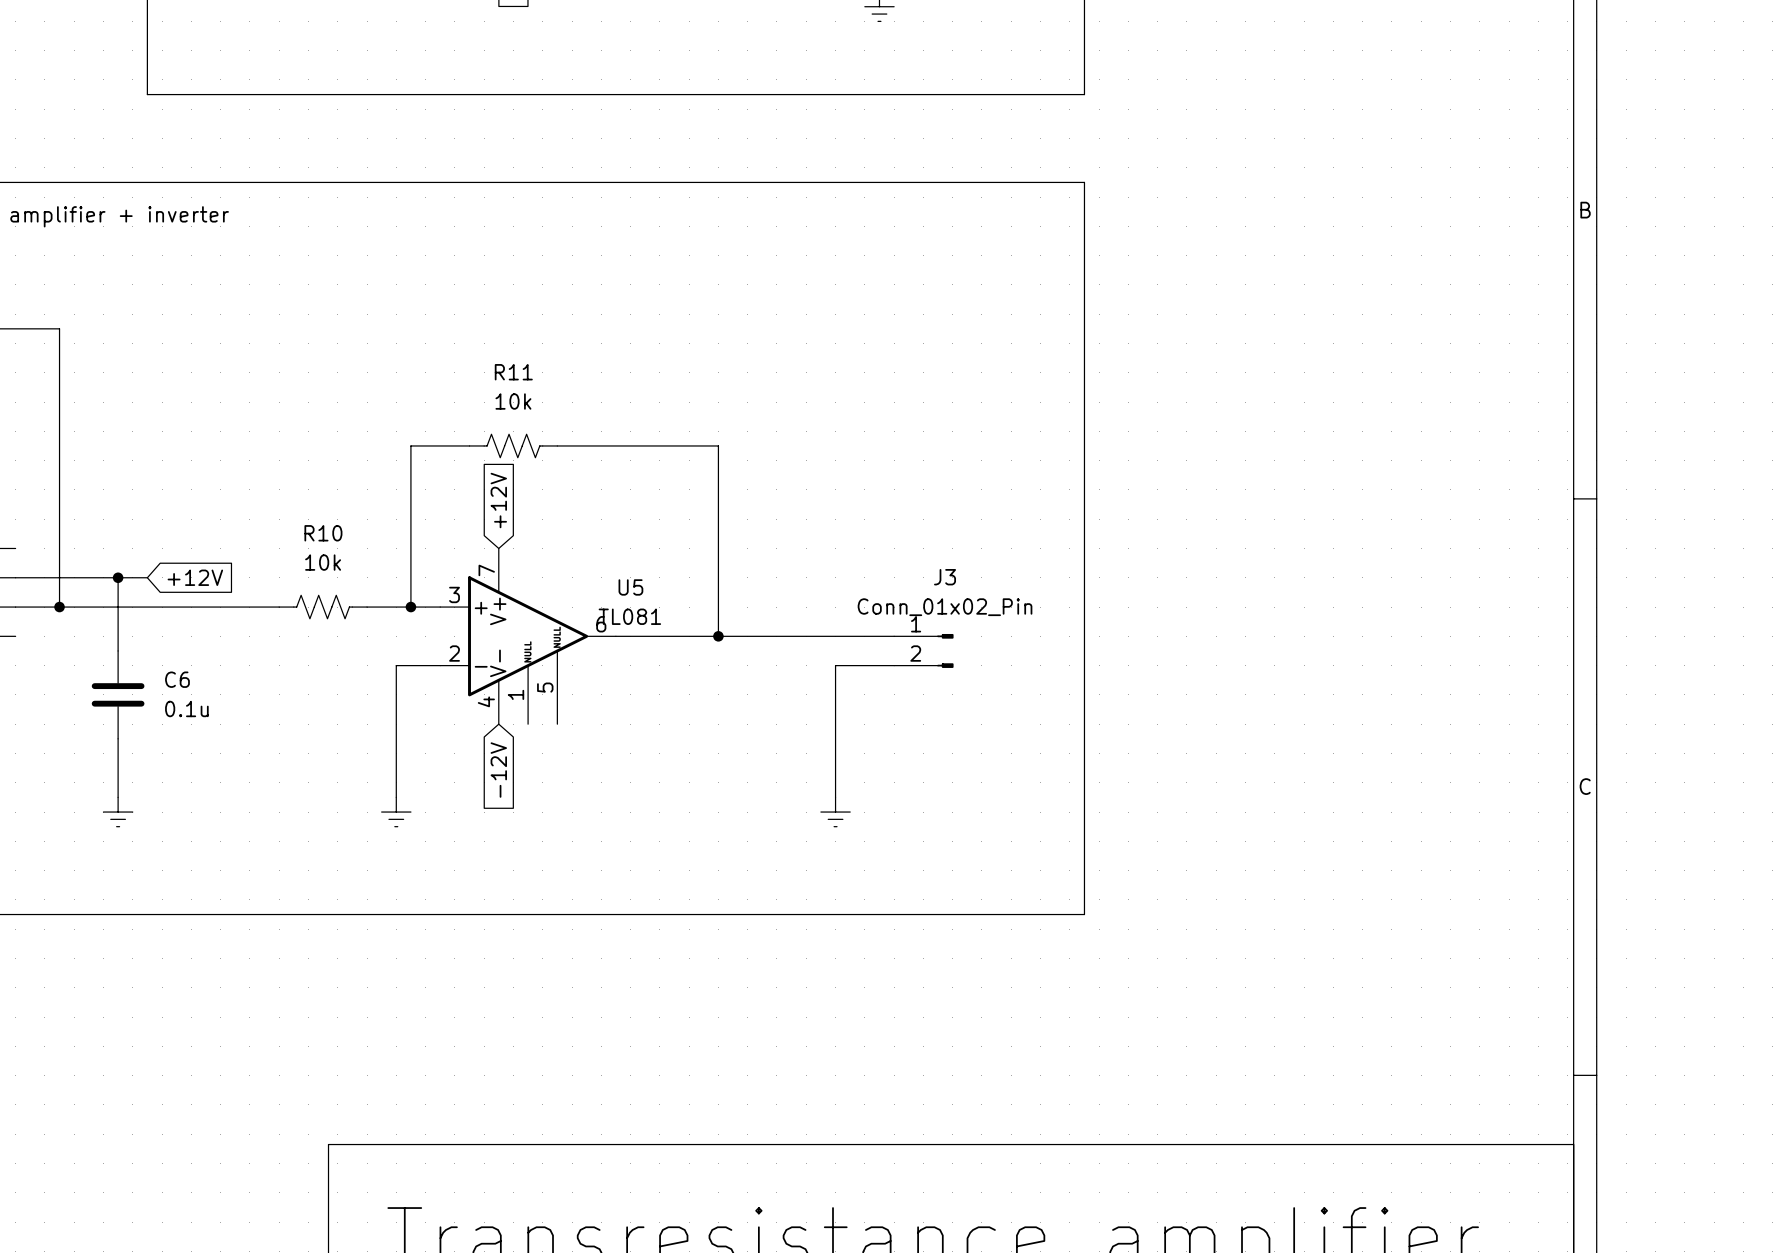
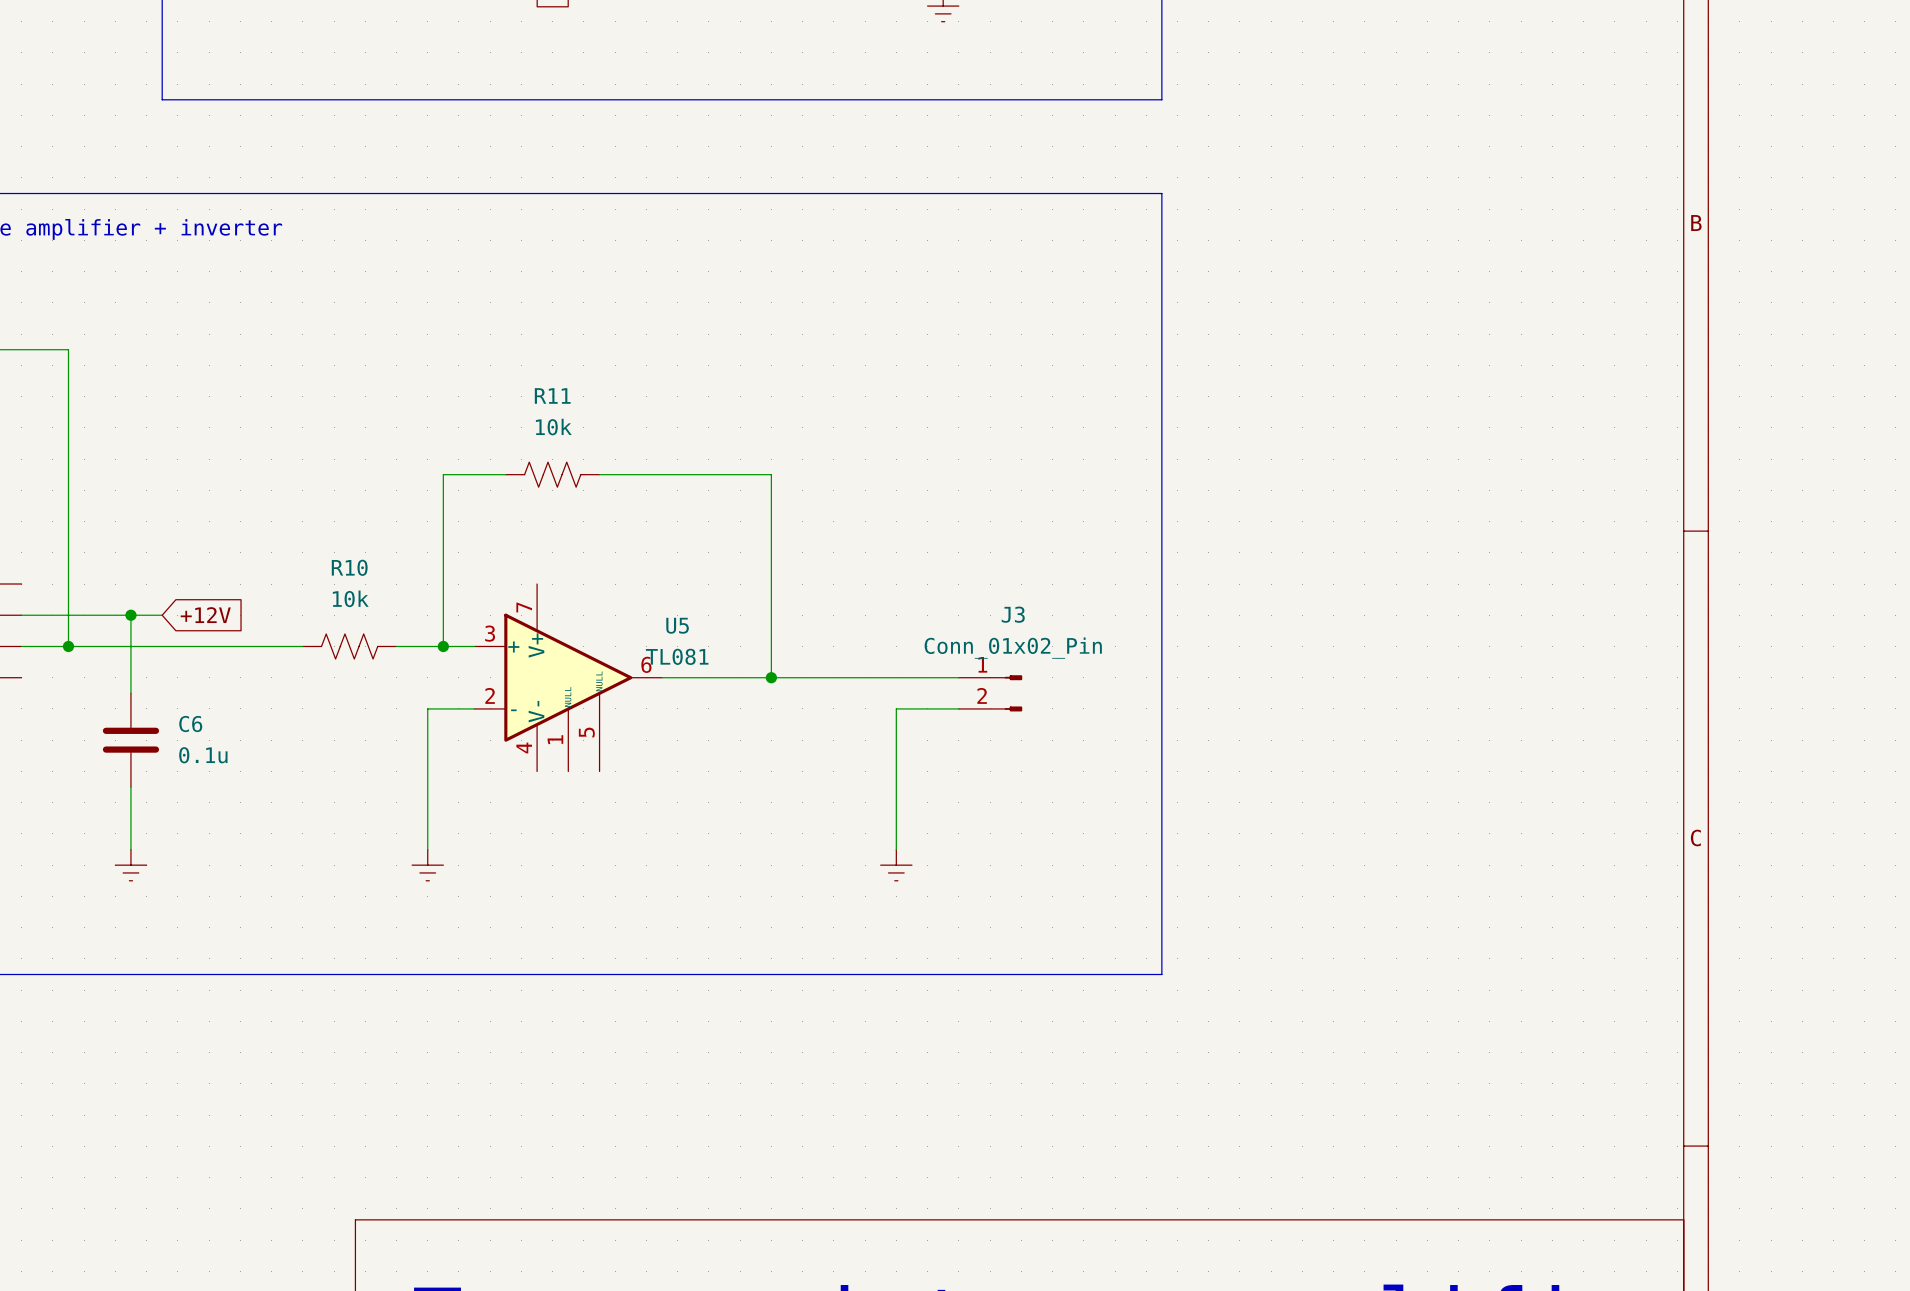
global label: +12V (498, 500) -> none
global label: -12V (498, 770) -> none

